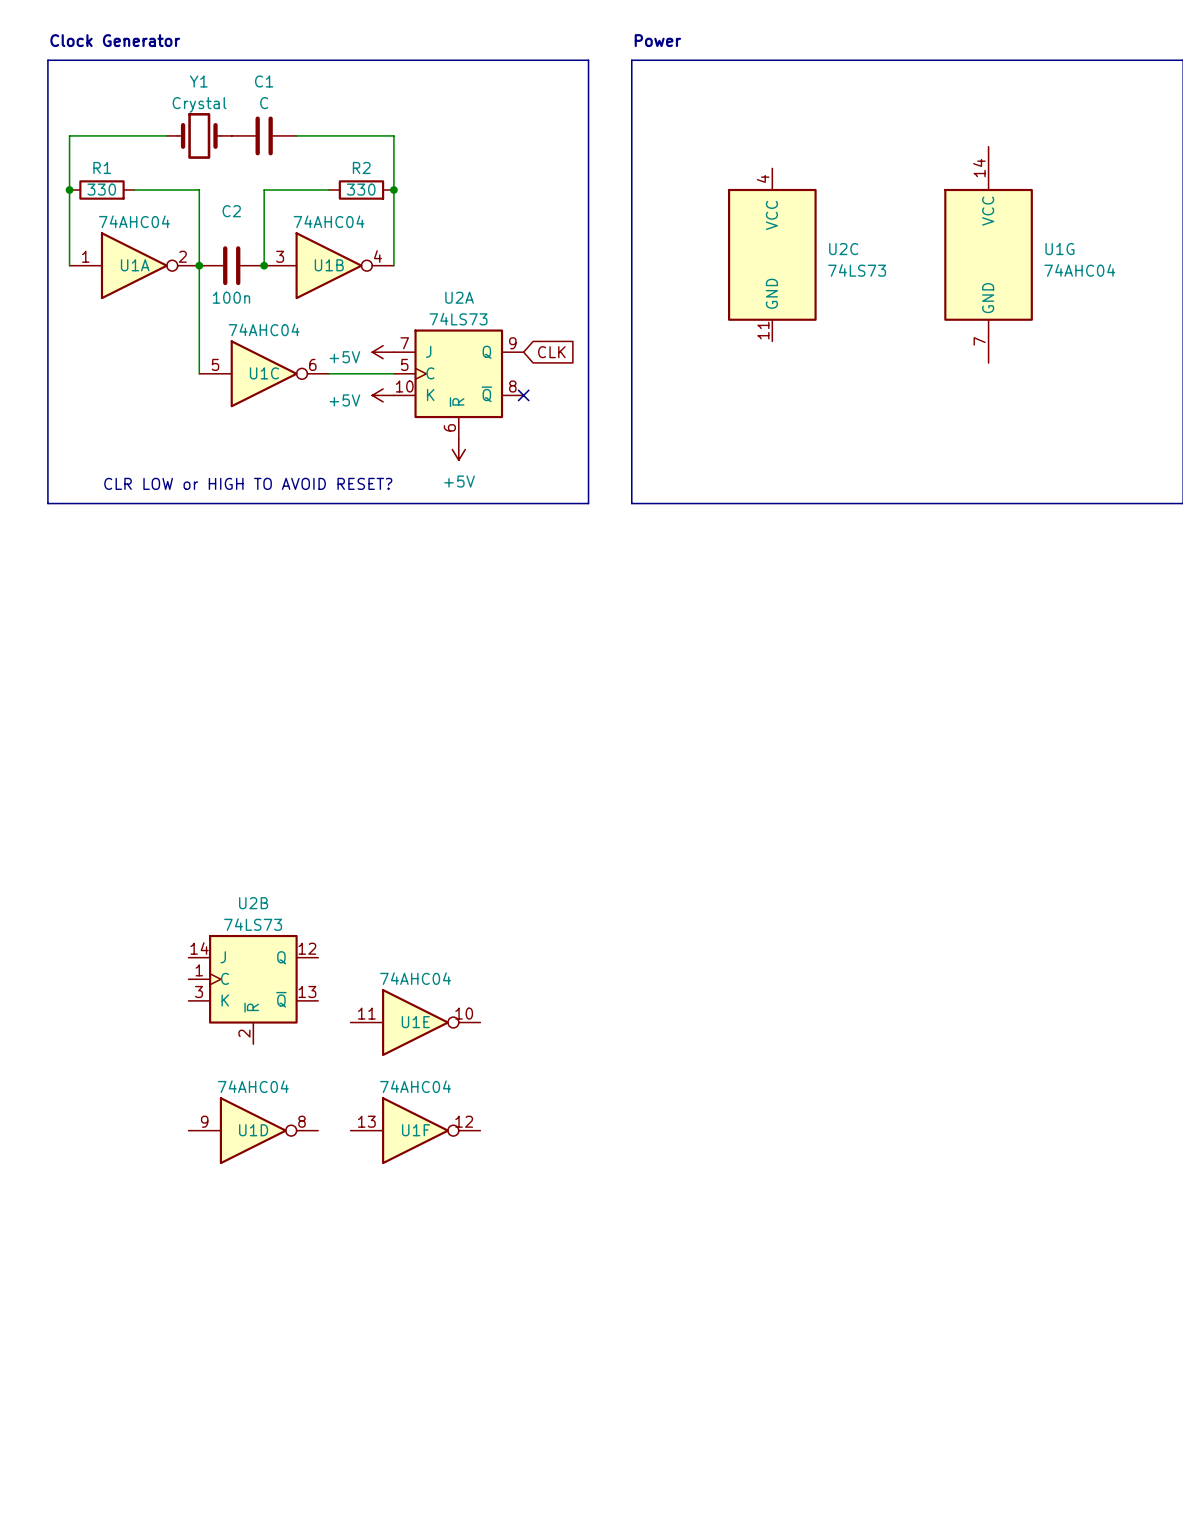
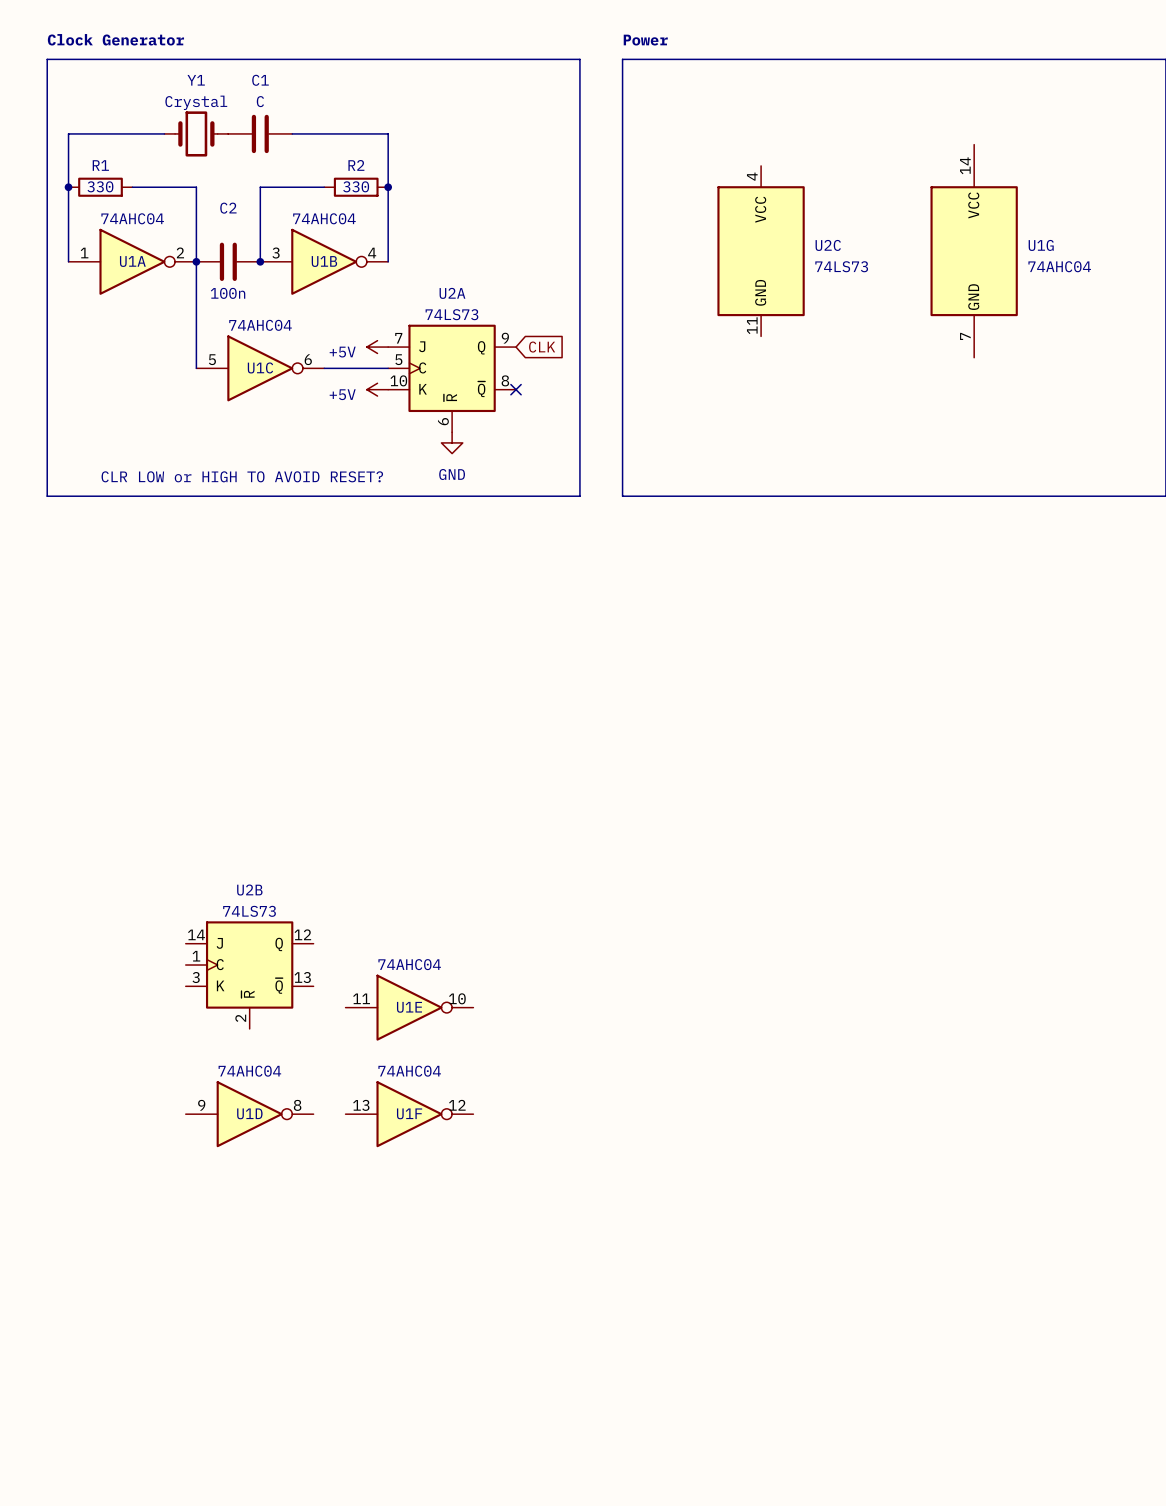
power symbol: +5V (458, 449) -> GND (452, 442)

